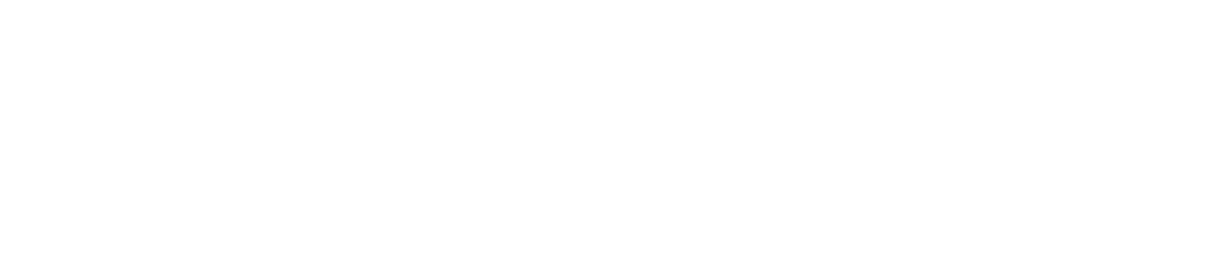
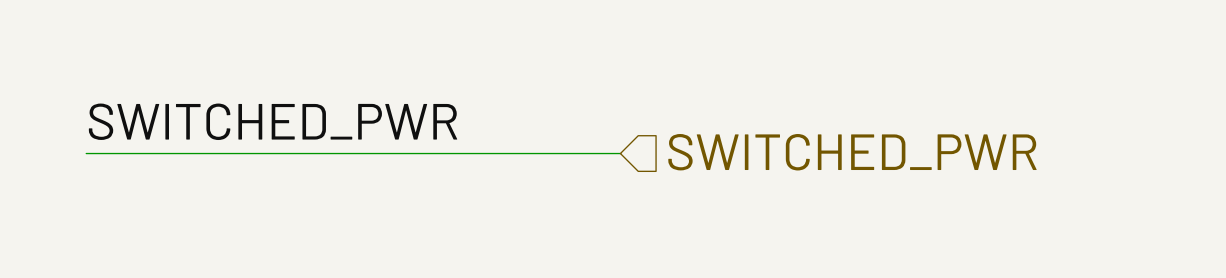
label: none -> SWITCHED_PWR (273, 121)
wire: none -> (86, 153) (620, 153)
hierarchical label: none -> SWITCHED_PWR (852, 152)

